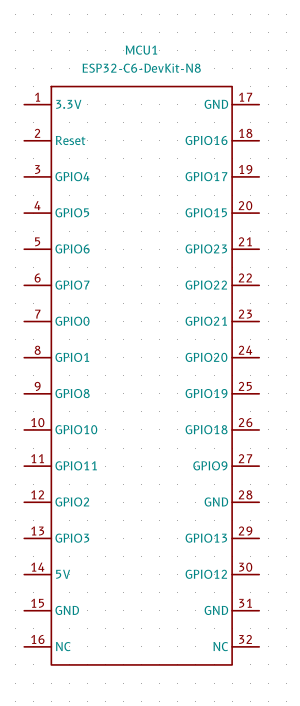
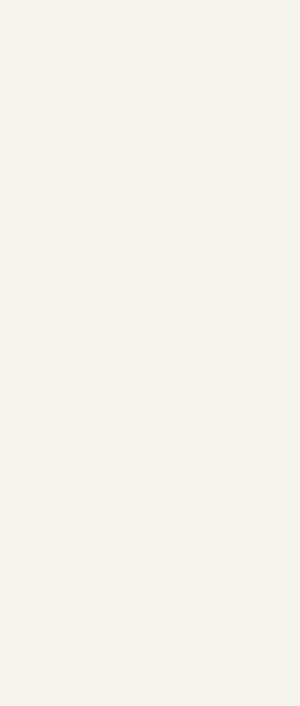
MCU1: ESP32-C6-DevKit-N8 (141, 375) -> none

